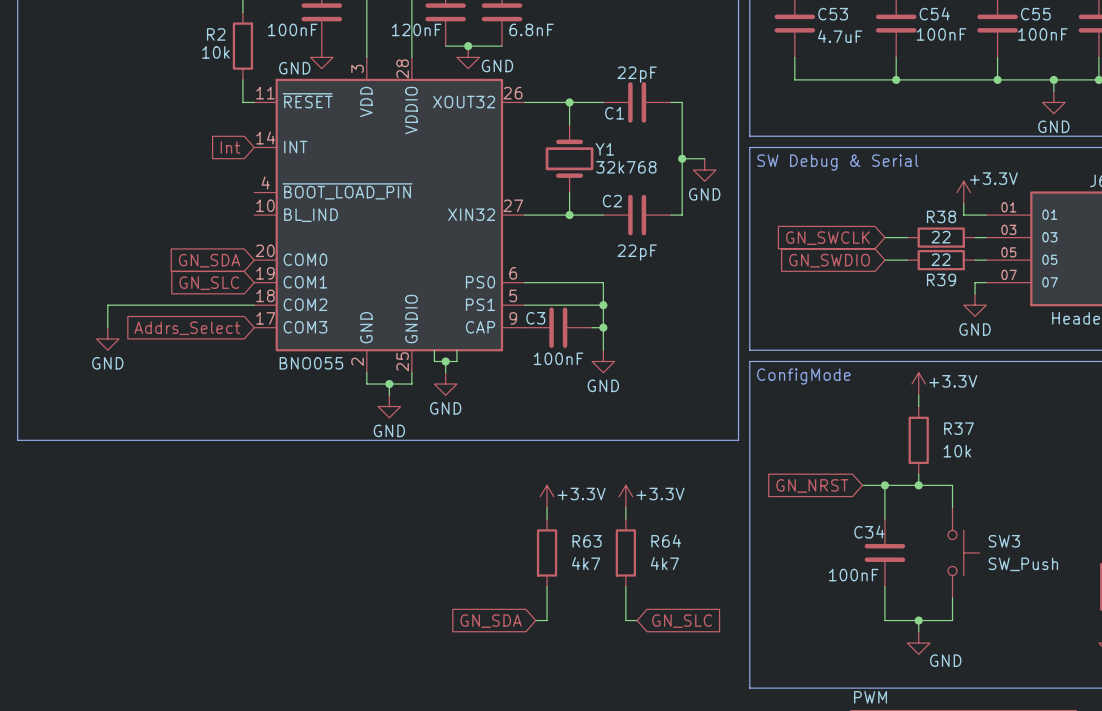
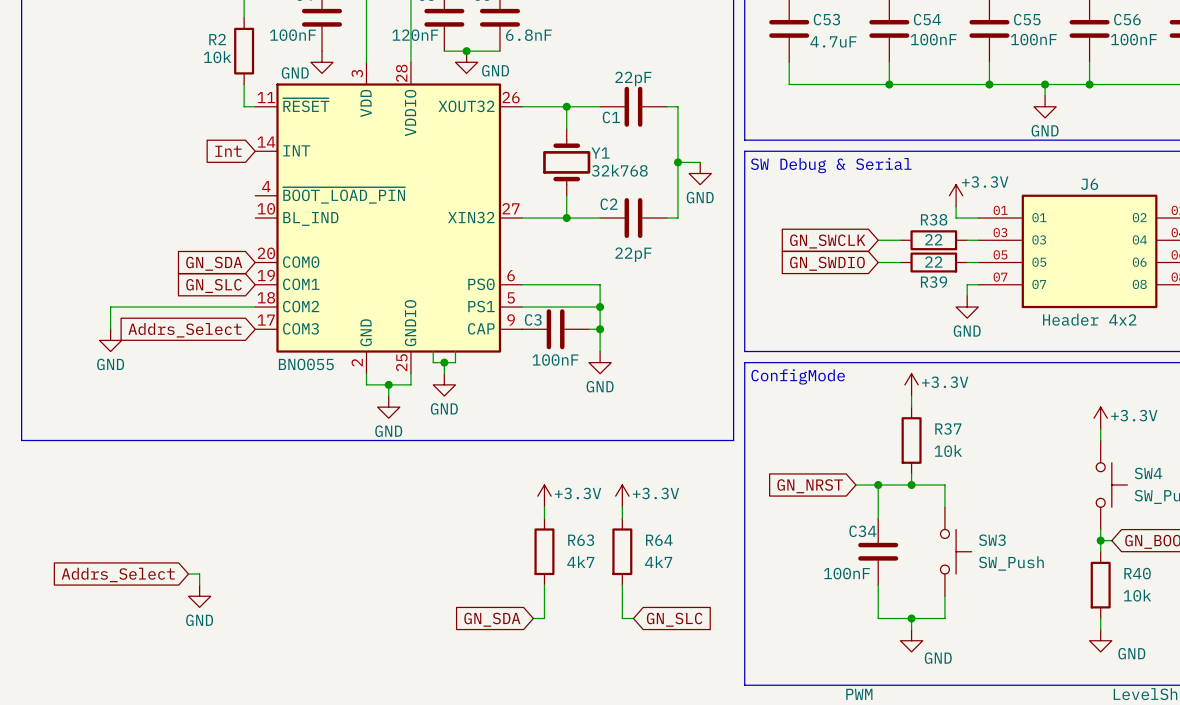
wire: none -> (188, 574) (199, 574) (199, 585)
global label: none -> Addrs_Select (118, 575)
power symbol: none -> GND (199, 596)

